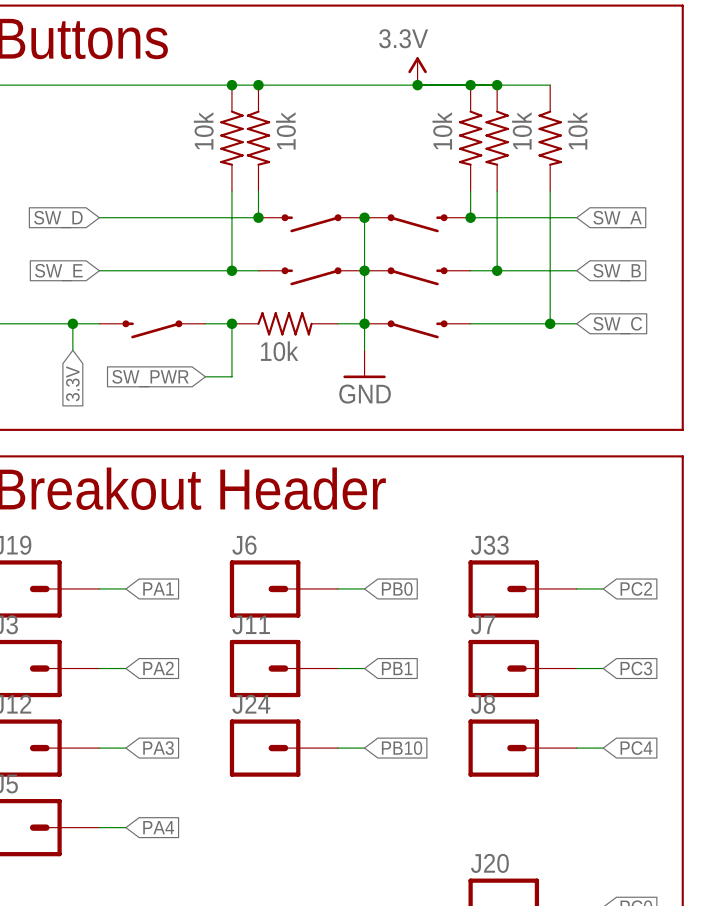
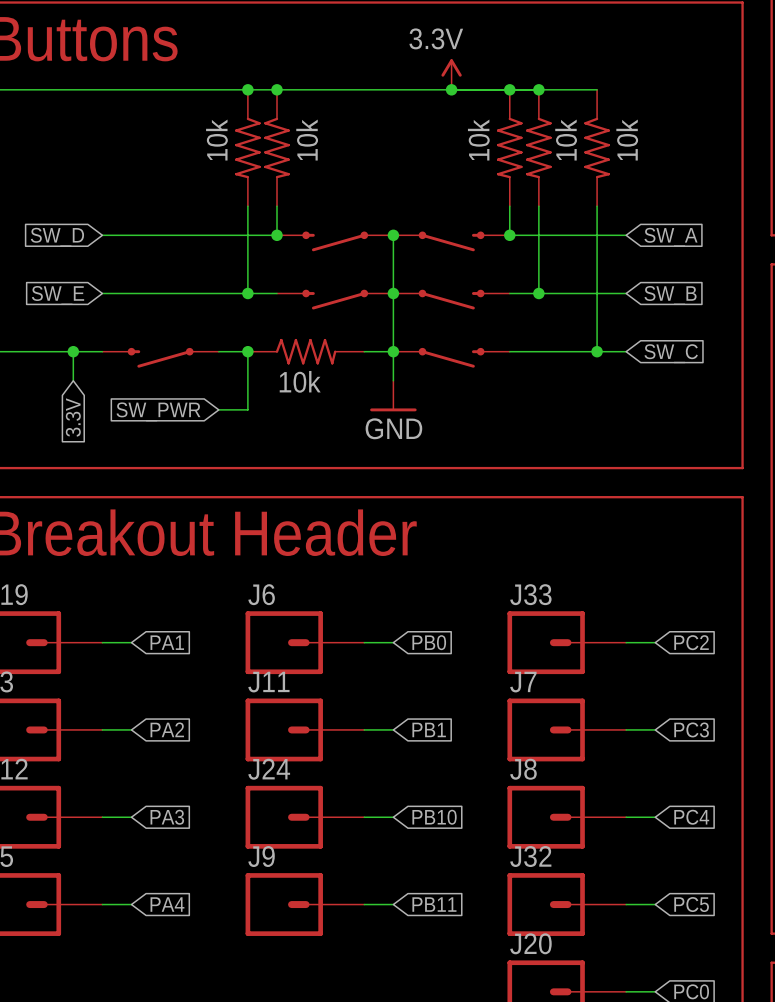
J9: none -> (304, 904)
wire: none -> (364, 904) (393, 904)
global label: none -> PB11 (434, 904)
J32: none -> (566, 904)
wire: none -> (626, 904) (655, 904)
global label: none -> PC5 (691, 904)

